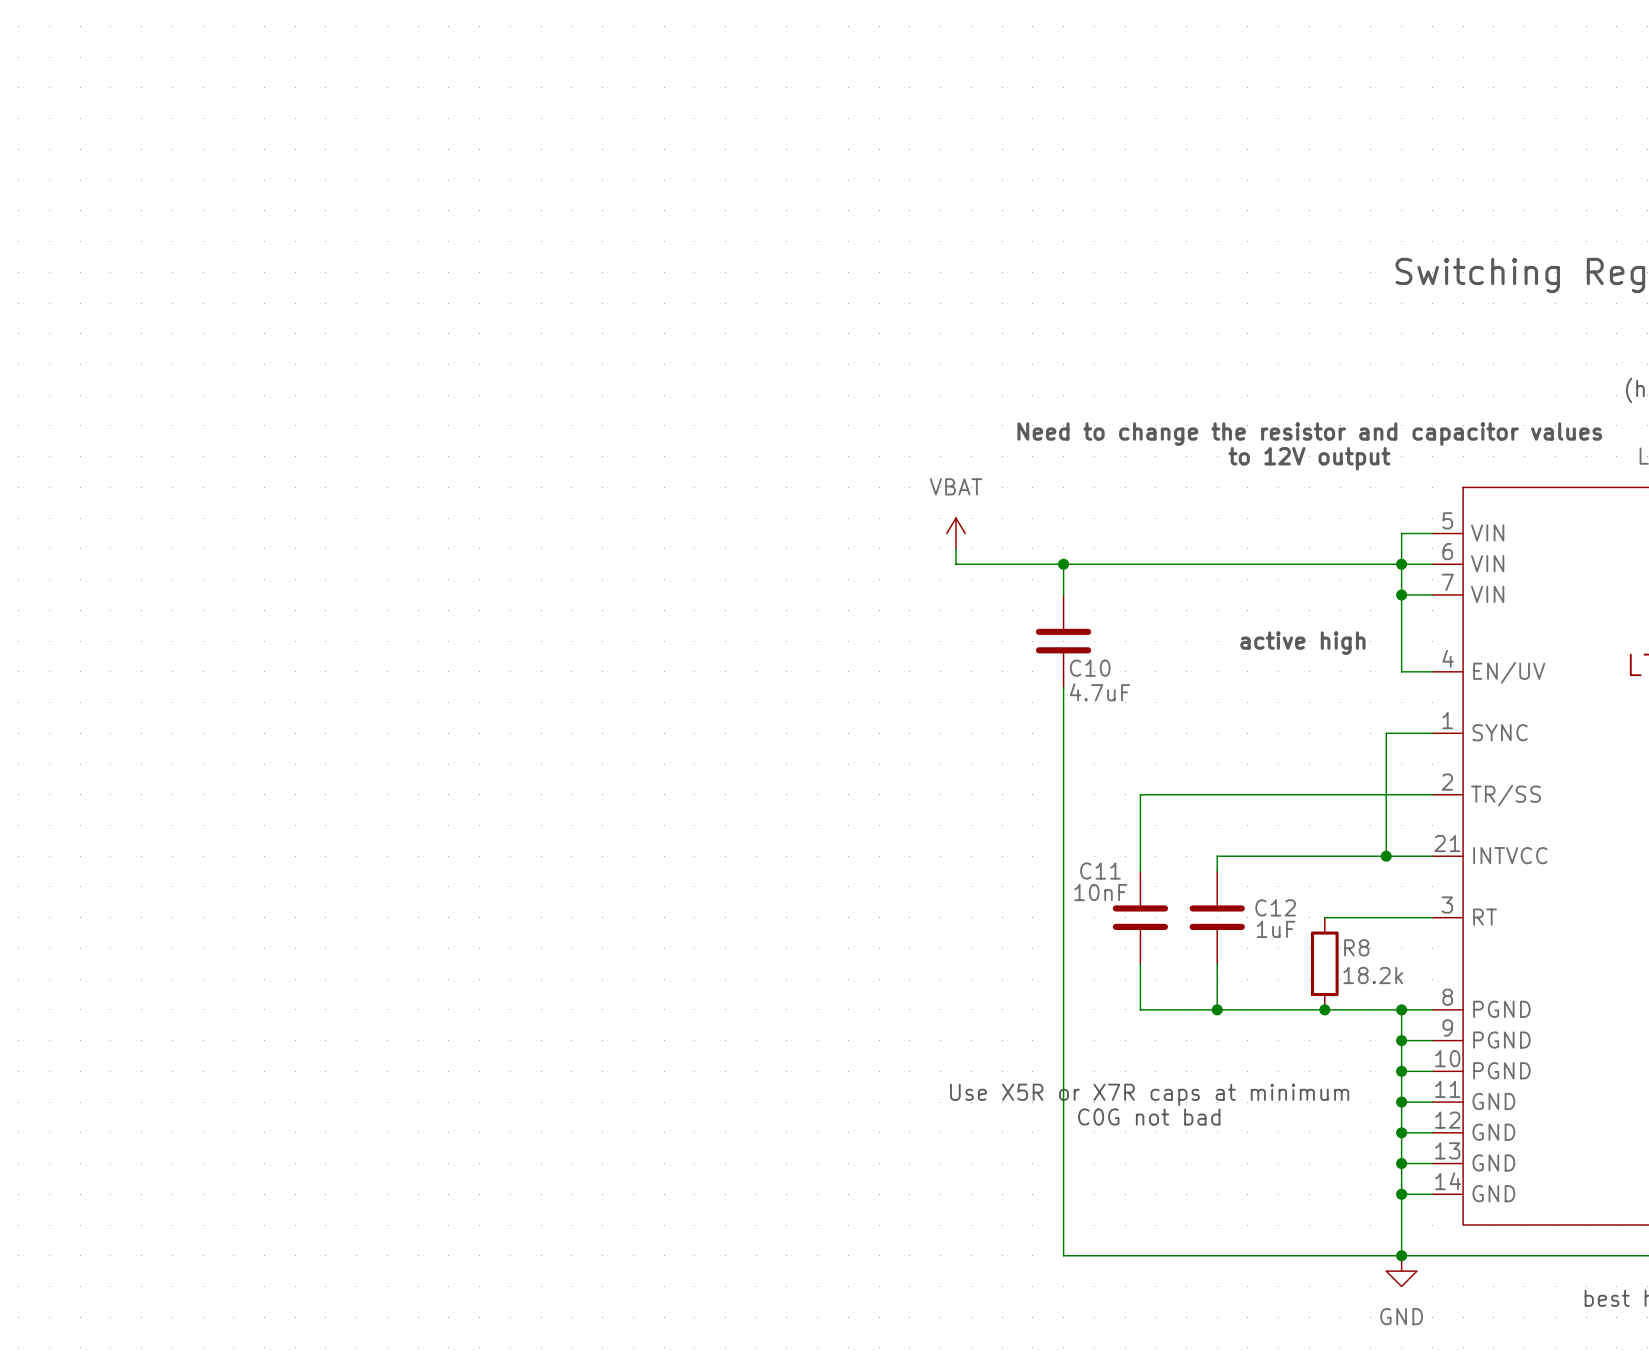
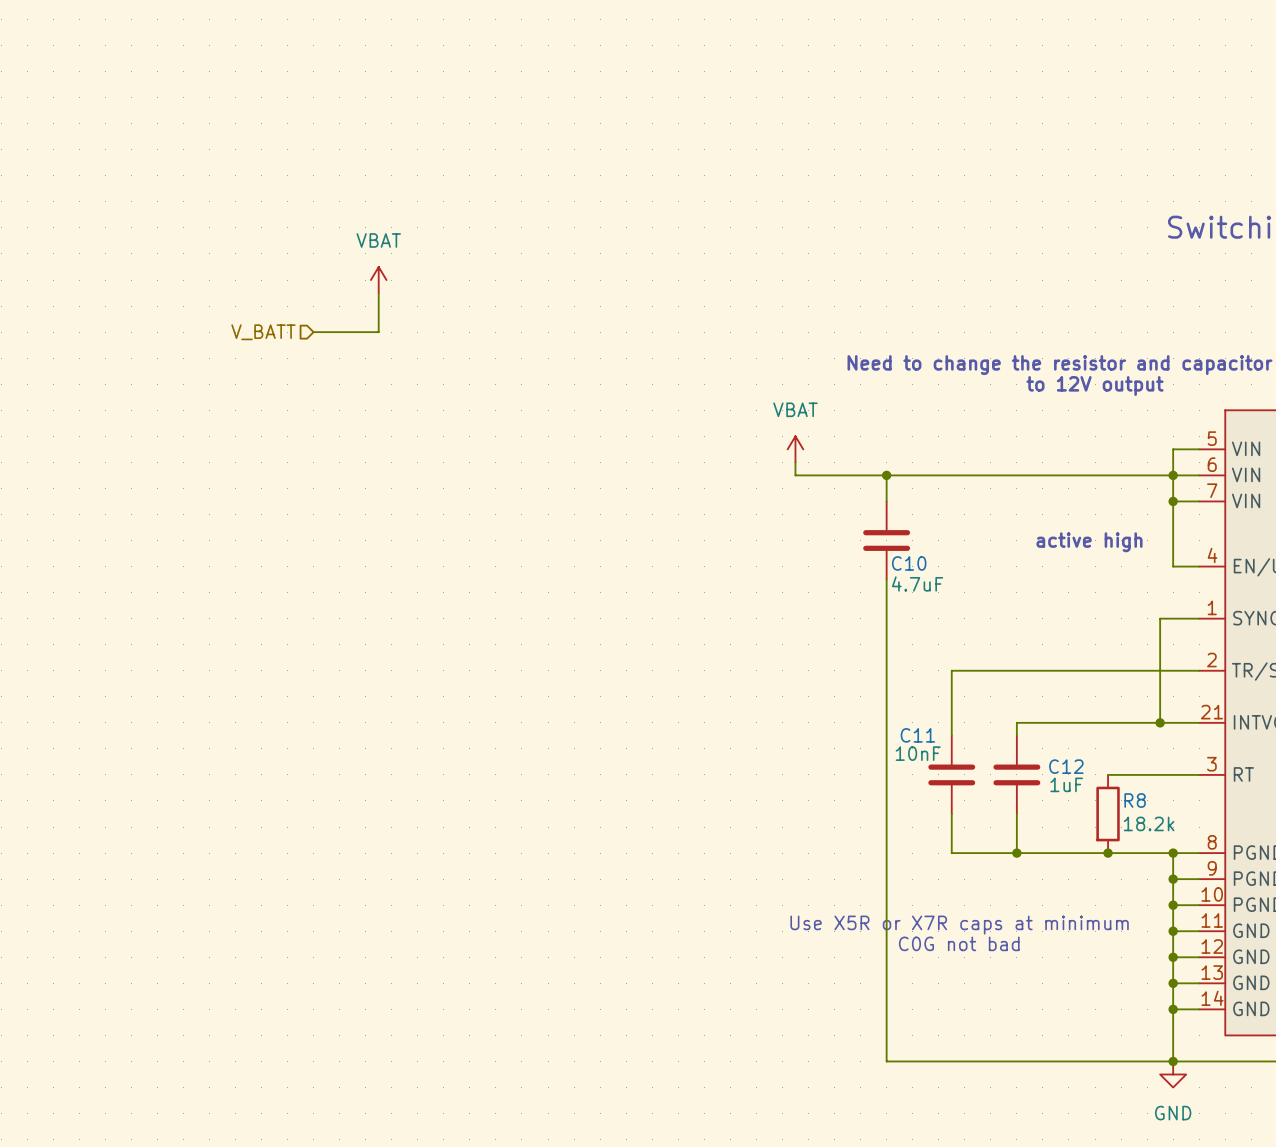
power symbol: none -> VBAT (378, 280)
wire: none -> (378, 293) (378, 332) (313, 332)
hierarchical label: none -> V_BATT (263, 332)

